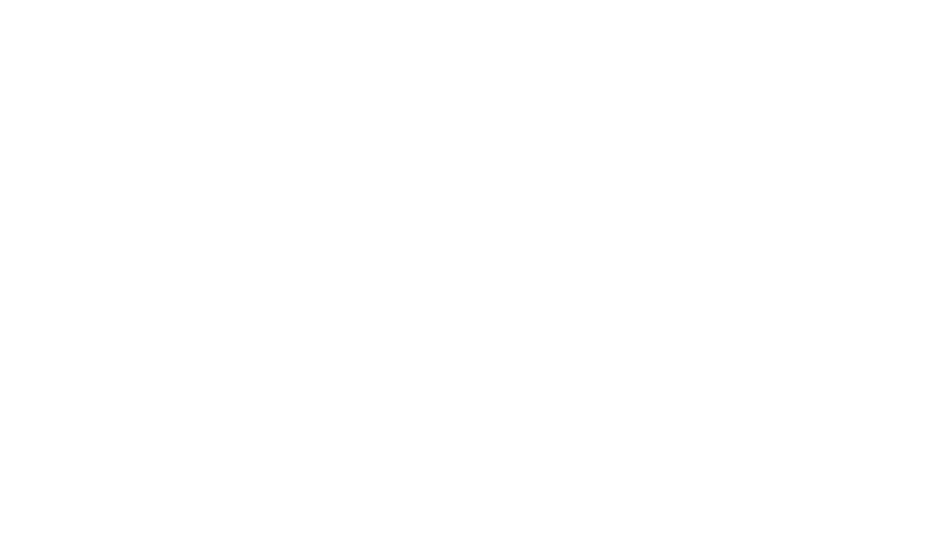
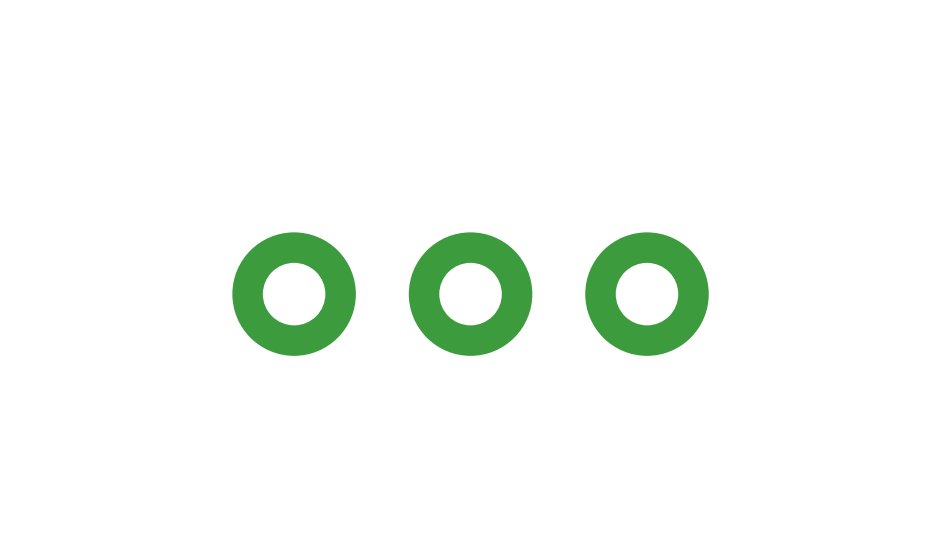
part: none -> (470, 294)

